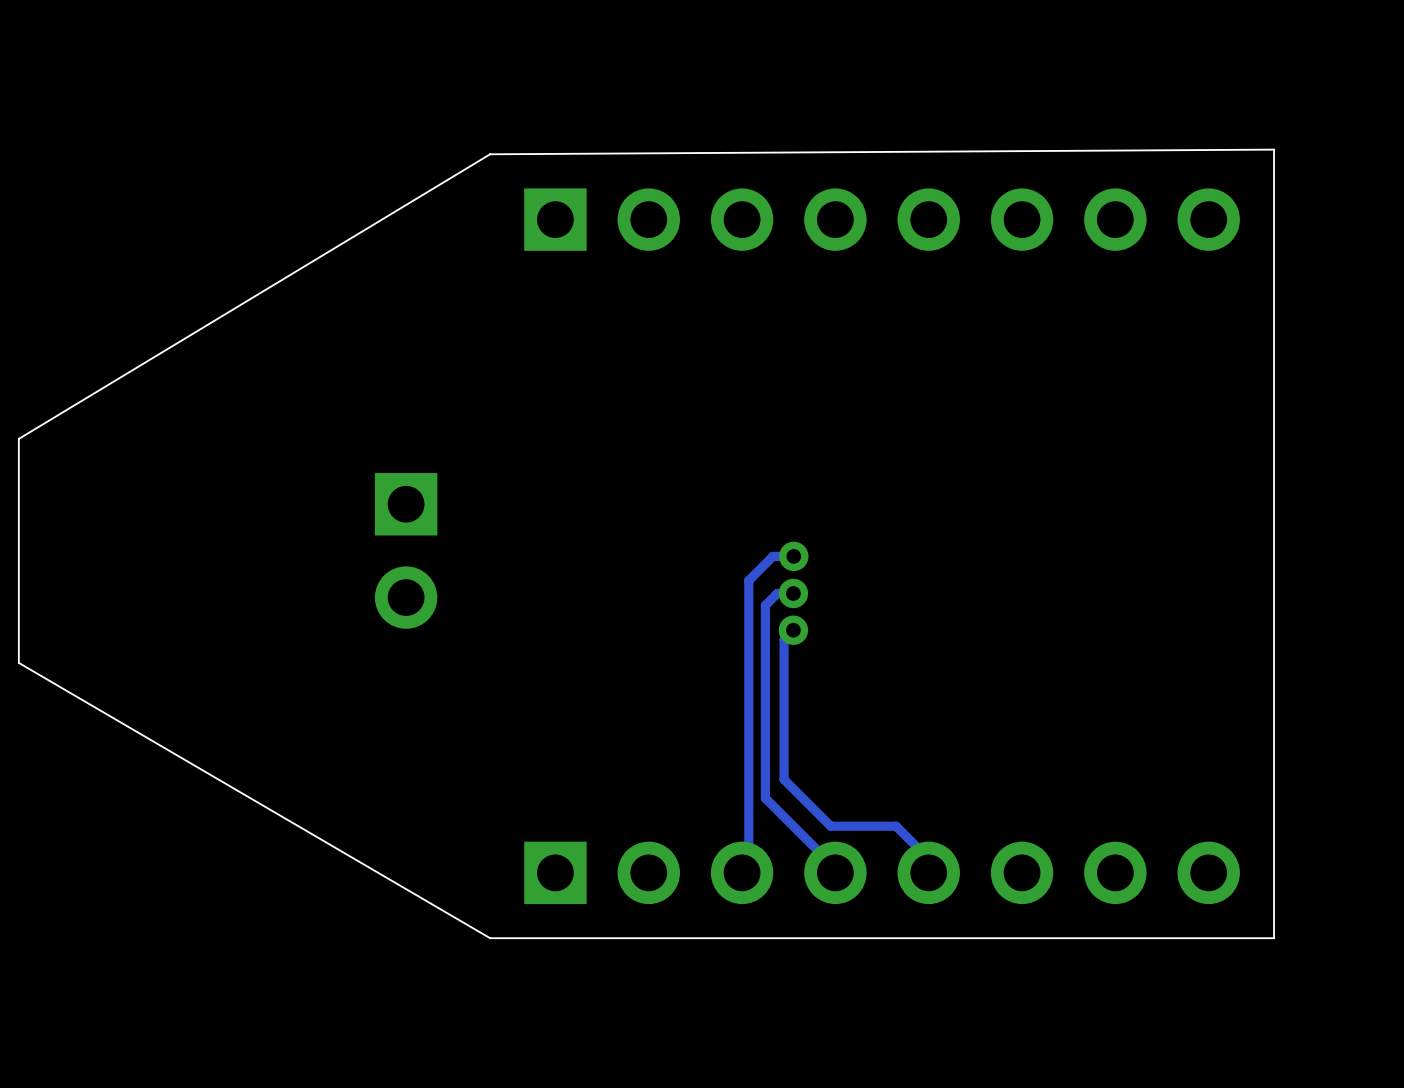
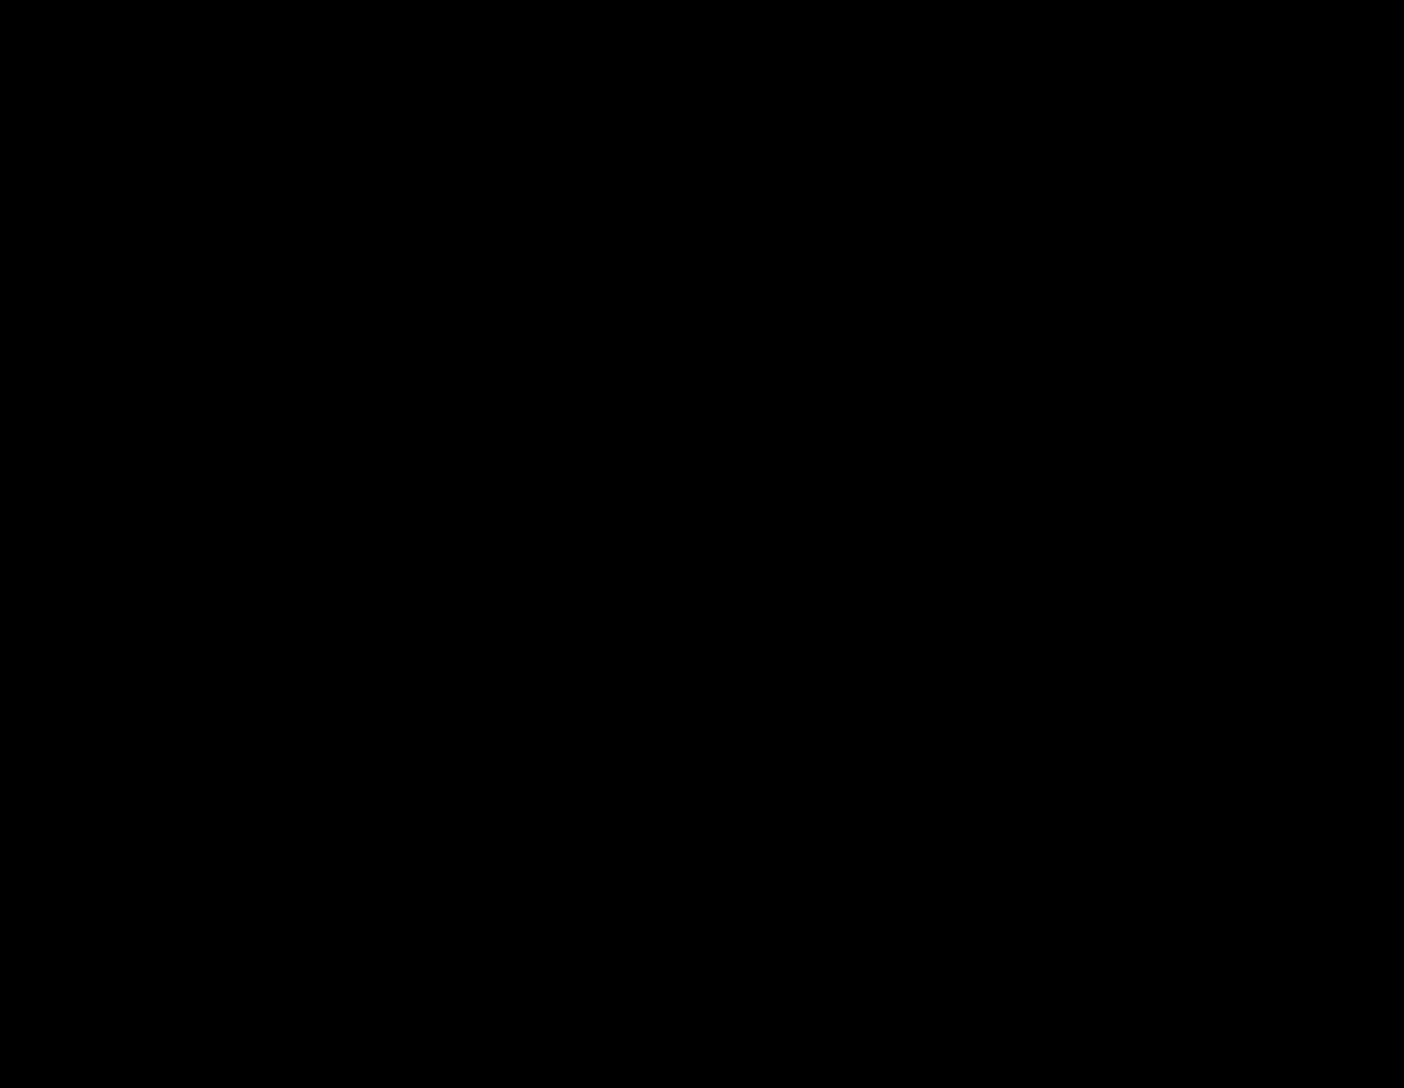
board edge: (1274, 149) (490, 154) (18, 438) (18, 662) (490, 938) (1274, 938) (1274, 149) -> none
part: (882, 219) -> none
part: (406, 550) -> none
track: (793, 556) (773, 556) (748, 580) (748, 870) (746, 872) -> none
via: (793, 556) -> none
track: (793, 593) (777, 593) (765, 605) (765, 798) (840, 872) -> none
via: (793, 593) -> none
track: (793, 630) (784, 639) (784, 779) (830, 826) (896, 826) (933, 863) (933, 872) -> none
via: (793, 630) -> none
part: (882, 872) -> none

